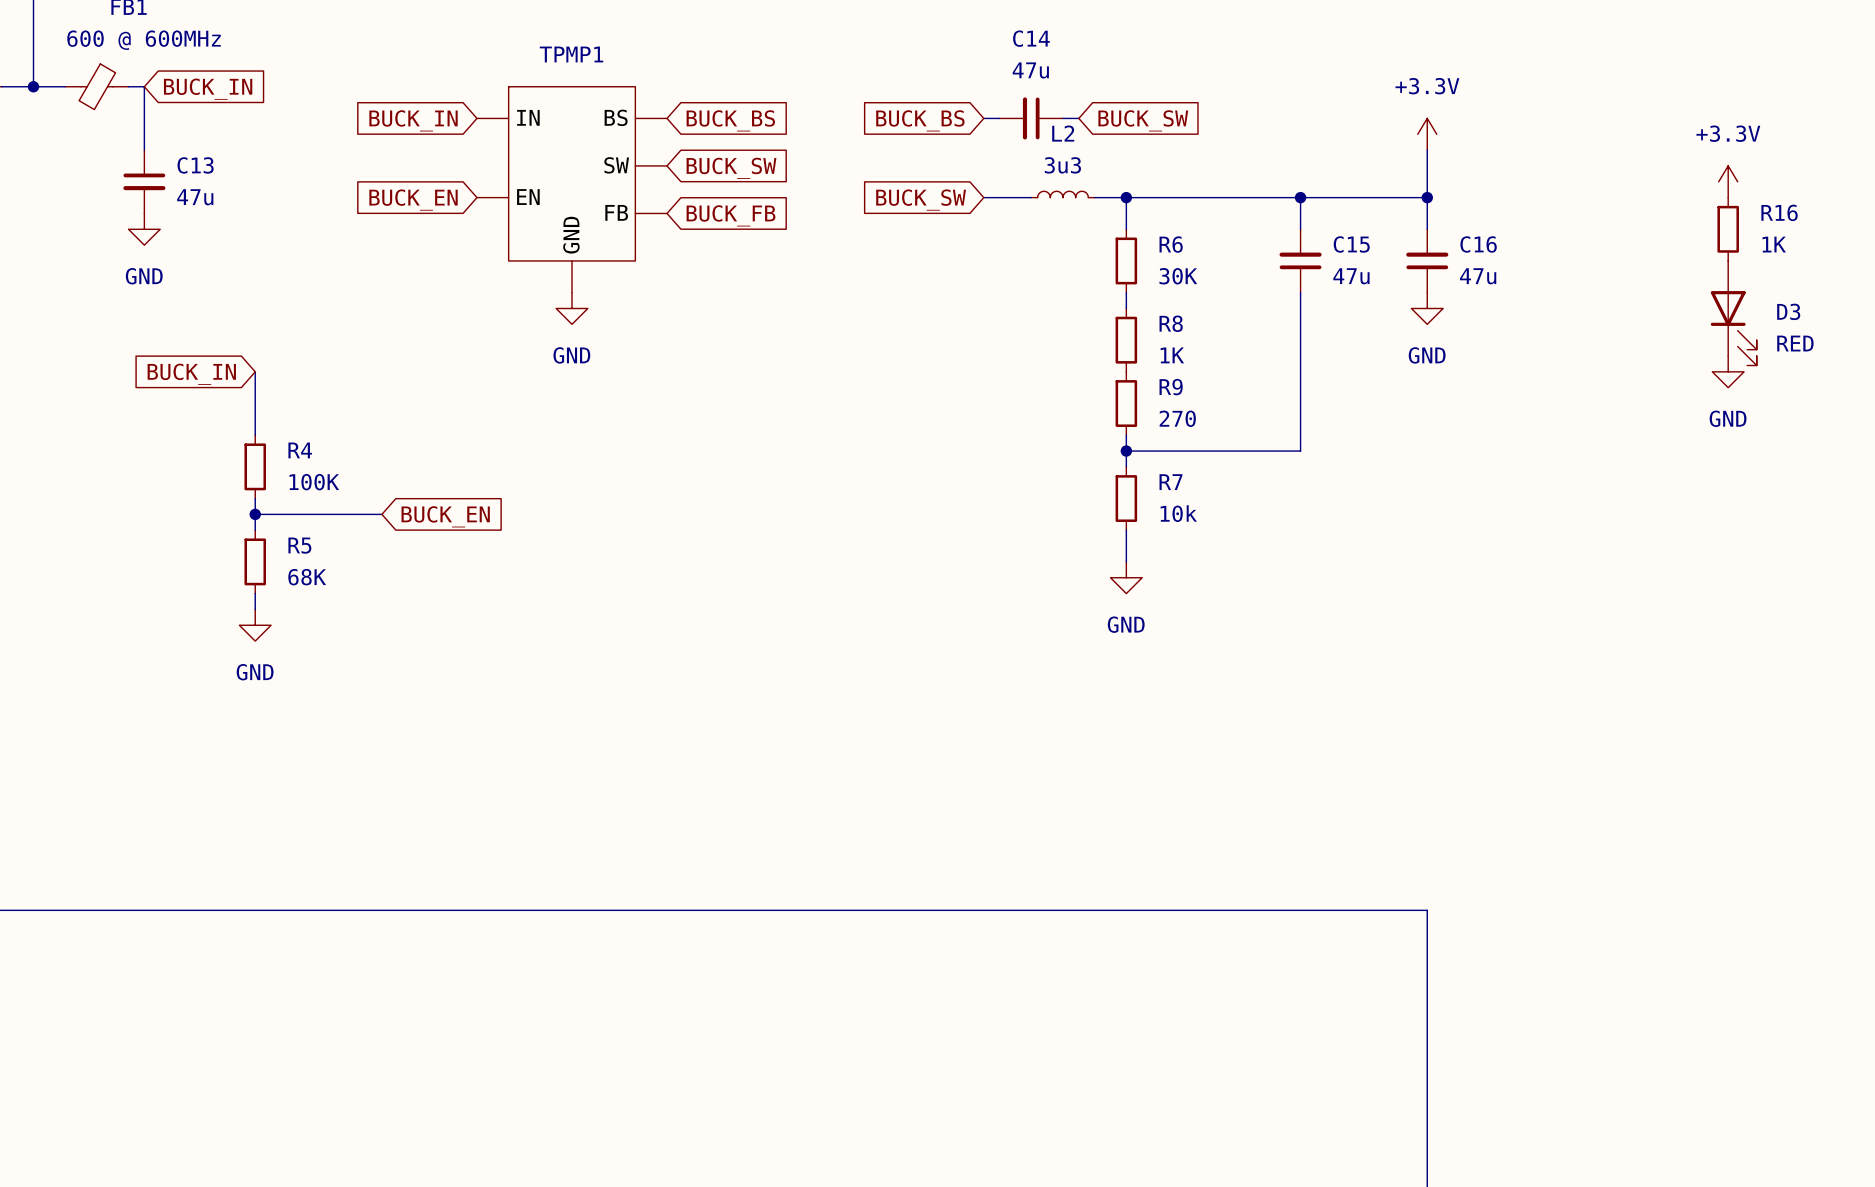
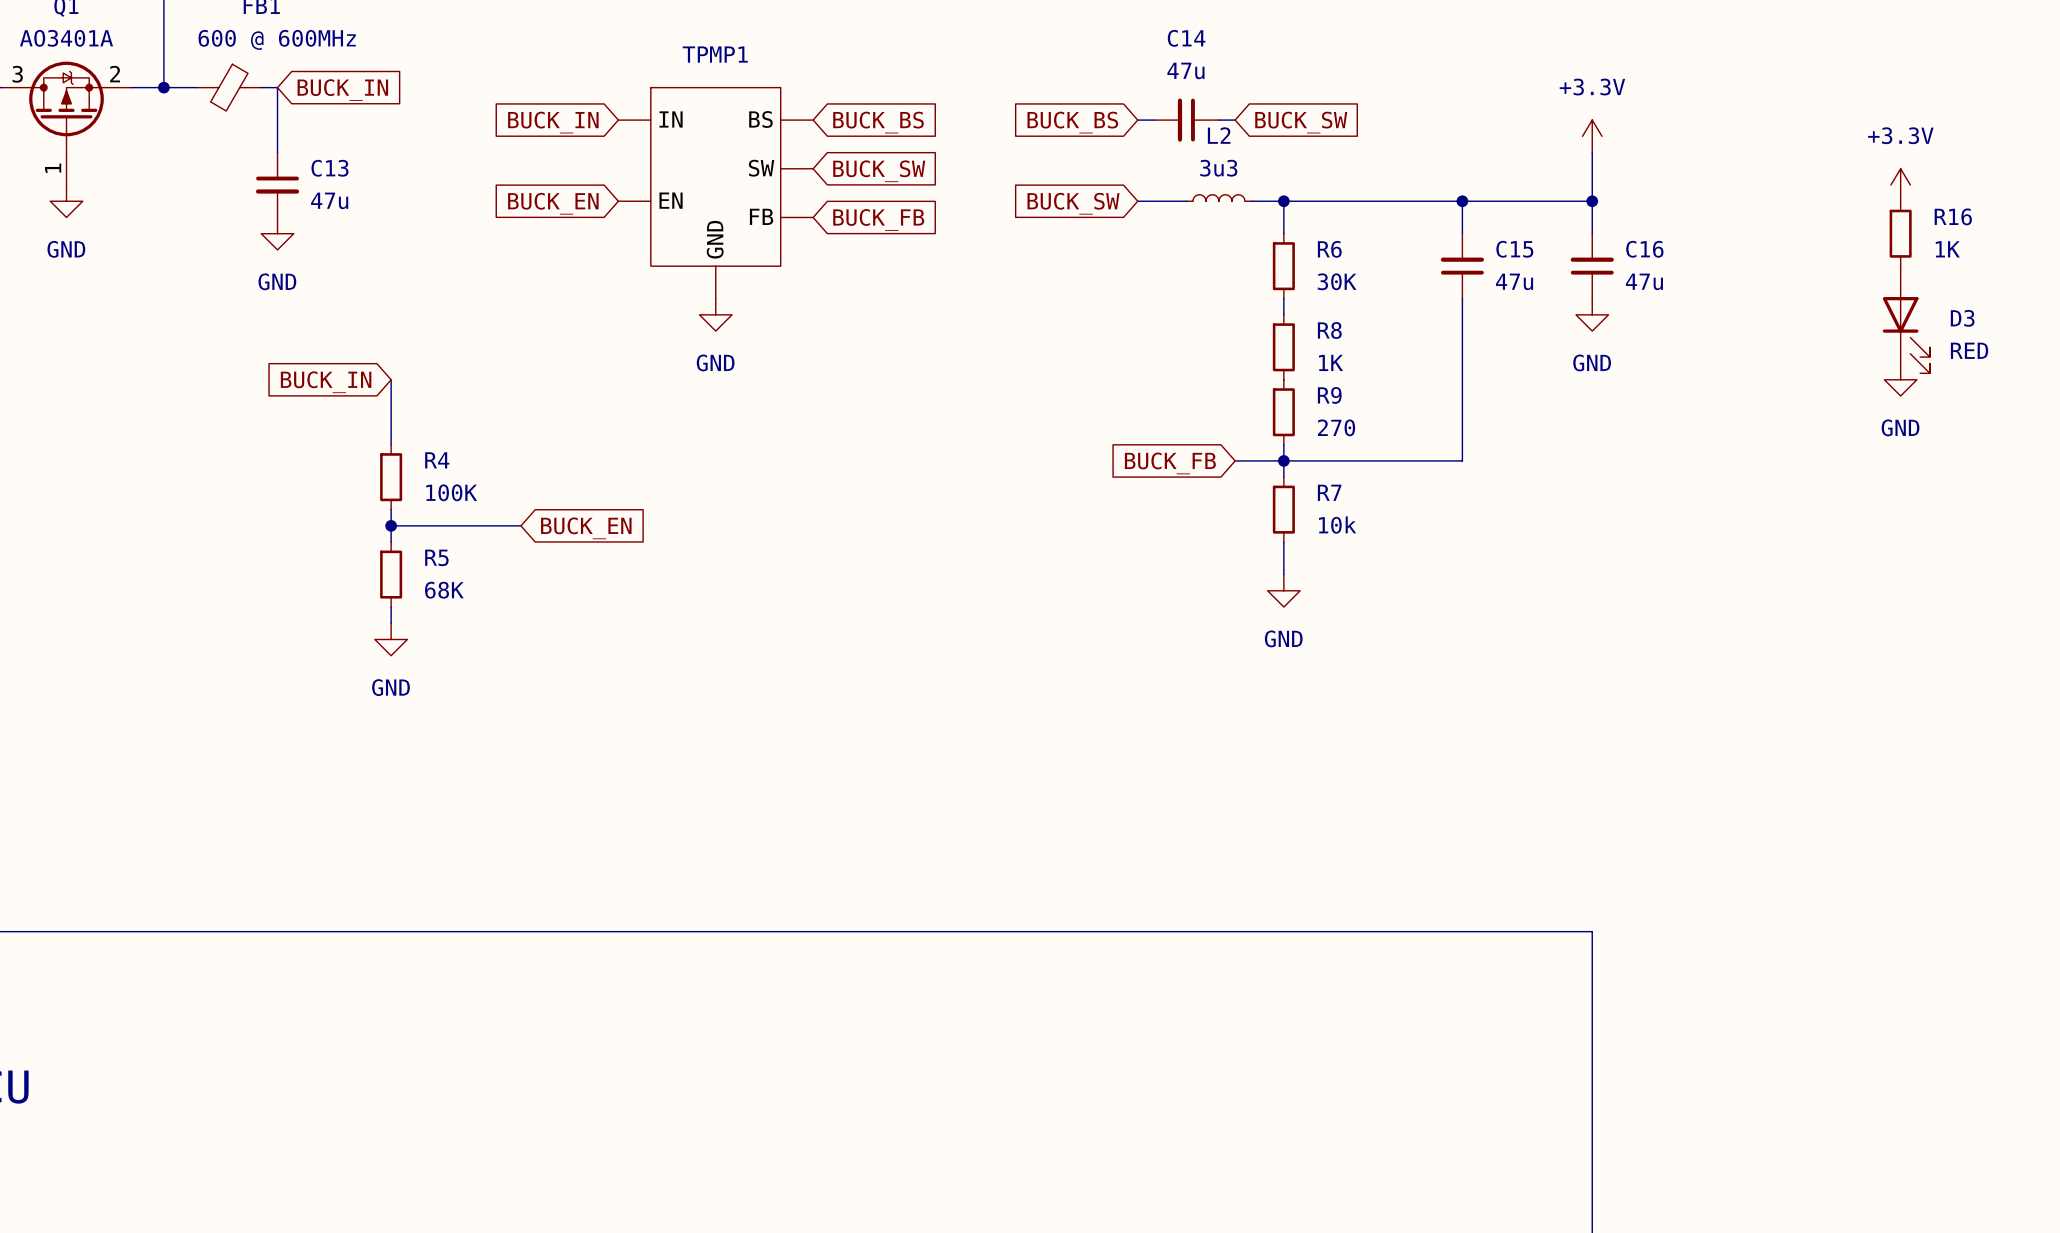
wire: none -> (1235, 460) (1283, 460)
global label: none -> BUCK_FB (1170, 463)

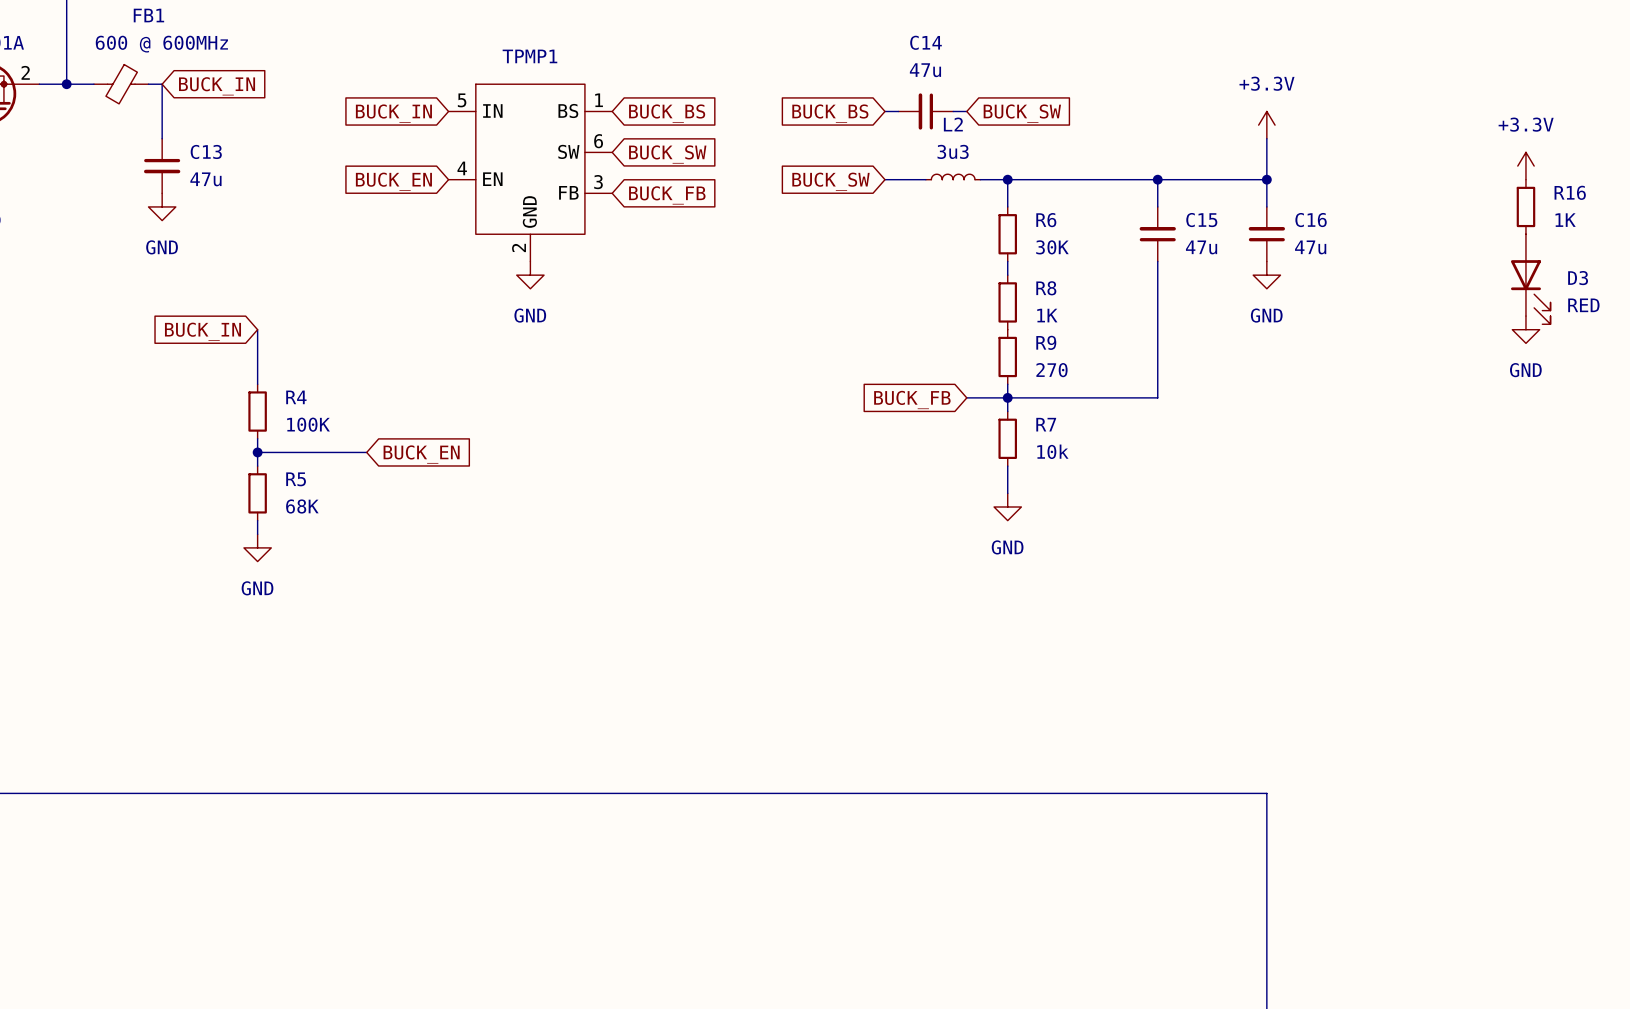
TPMP1 pin number: none -> 5 (462, 100)
TPMP1 pin number: none -> 1 (599, 100)
TPMP1 pin number: none -> 6 (598, 141)
TPMP1 pin number: none -> 4 (462, 168)
TPMP1 pin number: none -> 3 (598, 182)
TPMP1 pin number: none -> 2 (519, 247)

